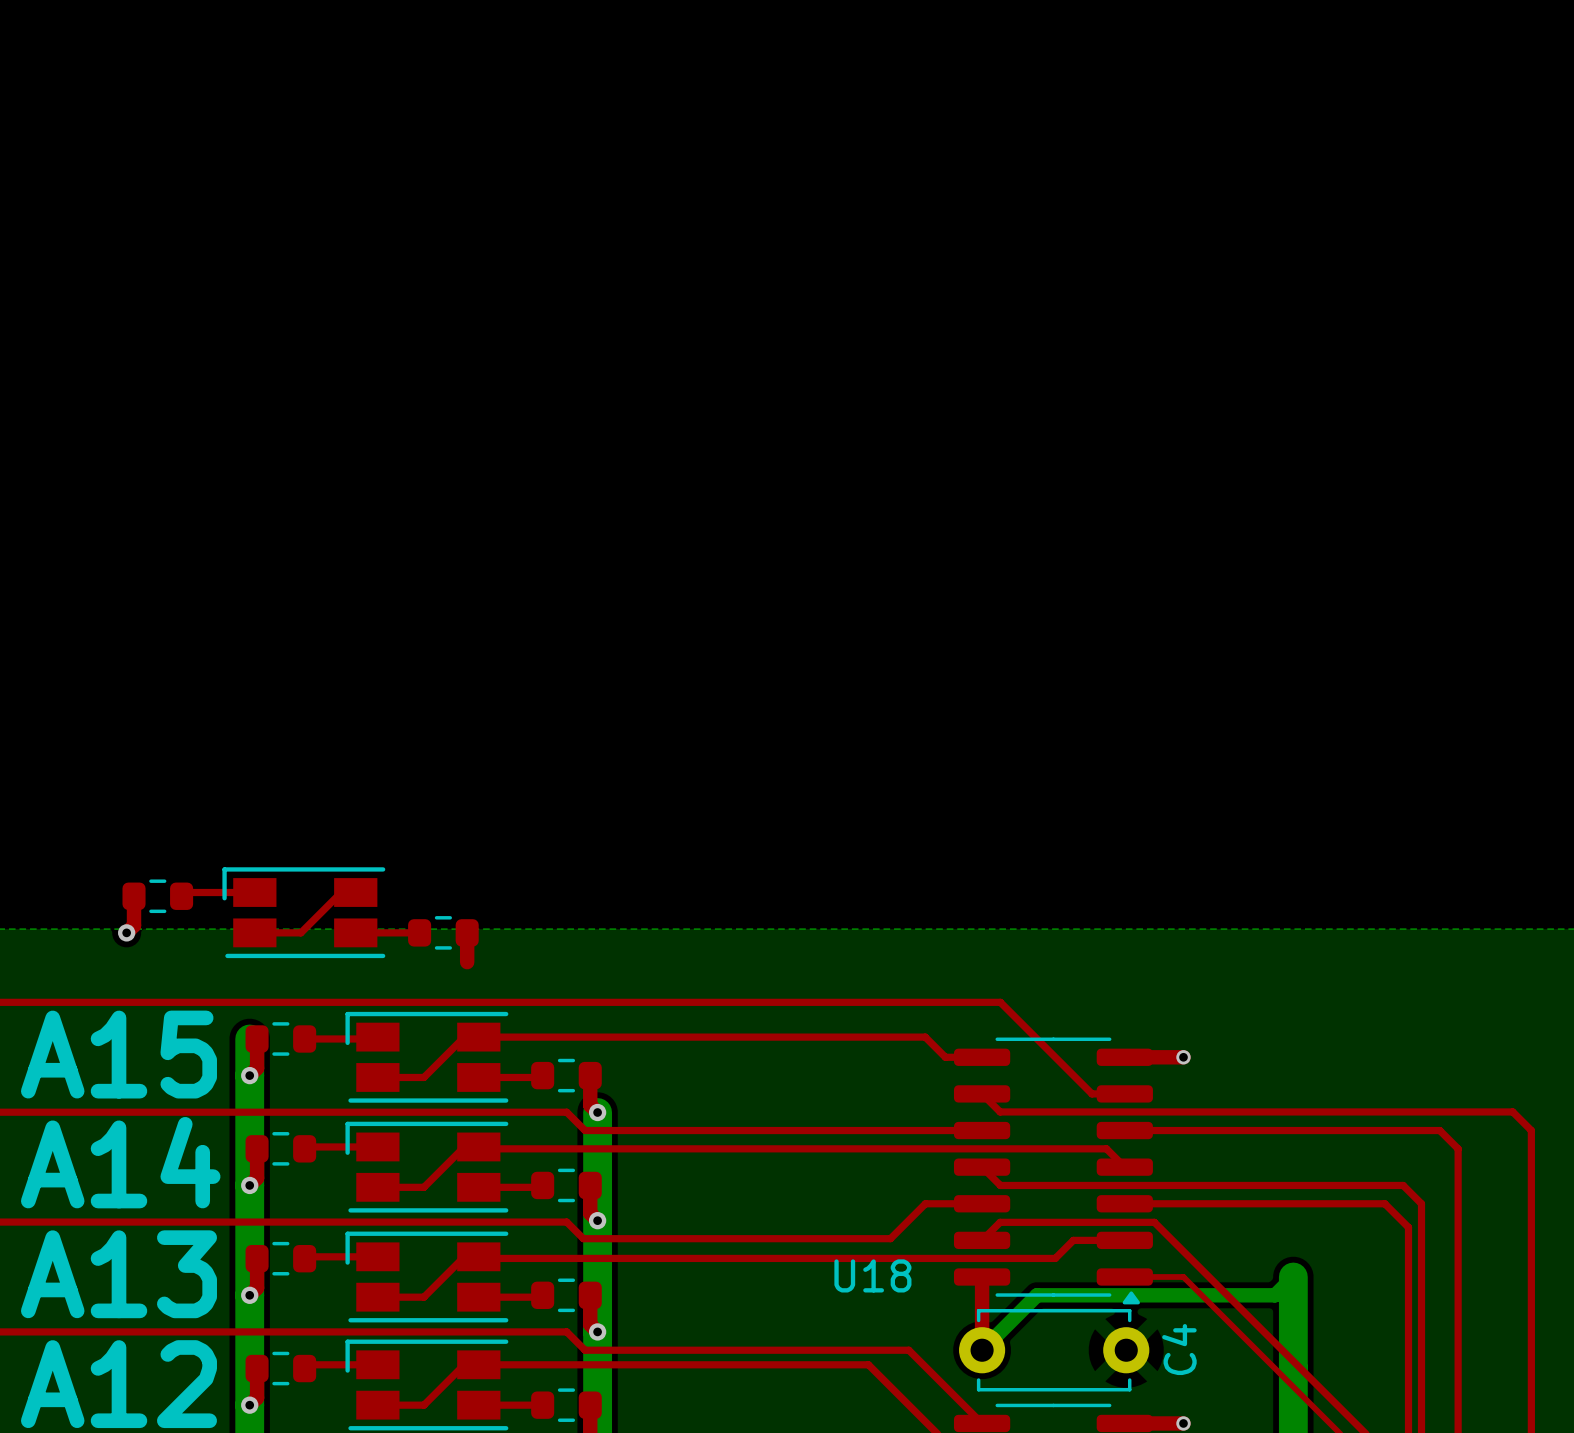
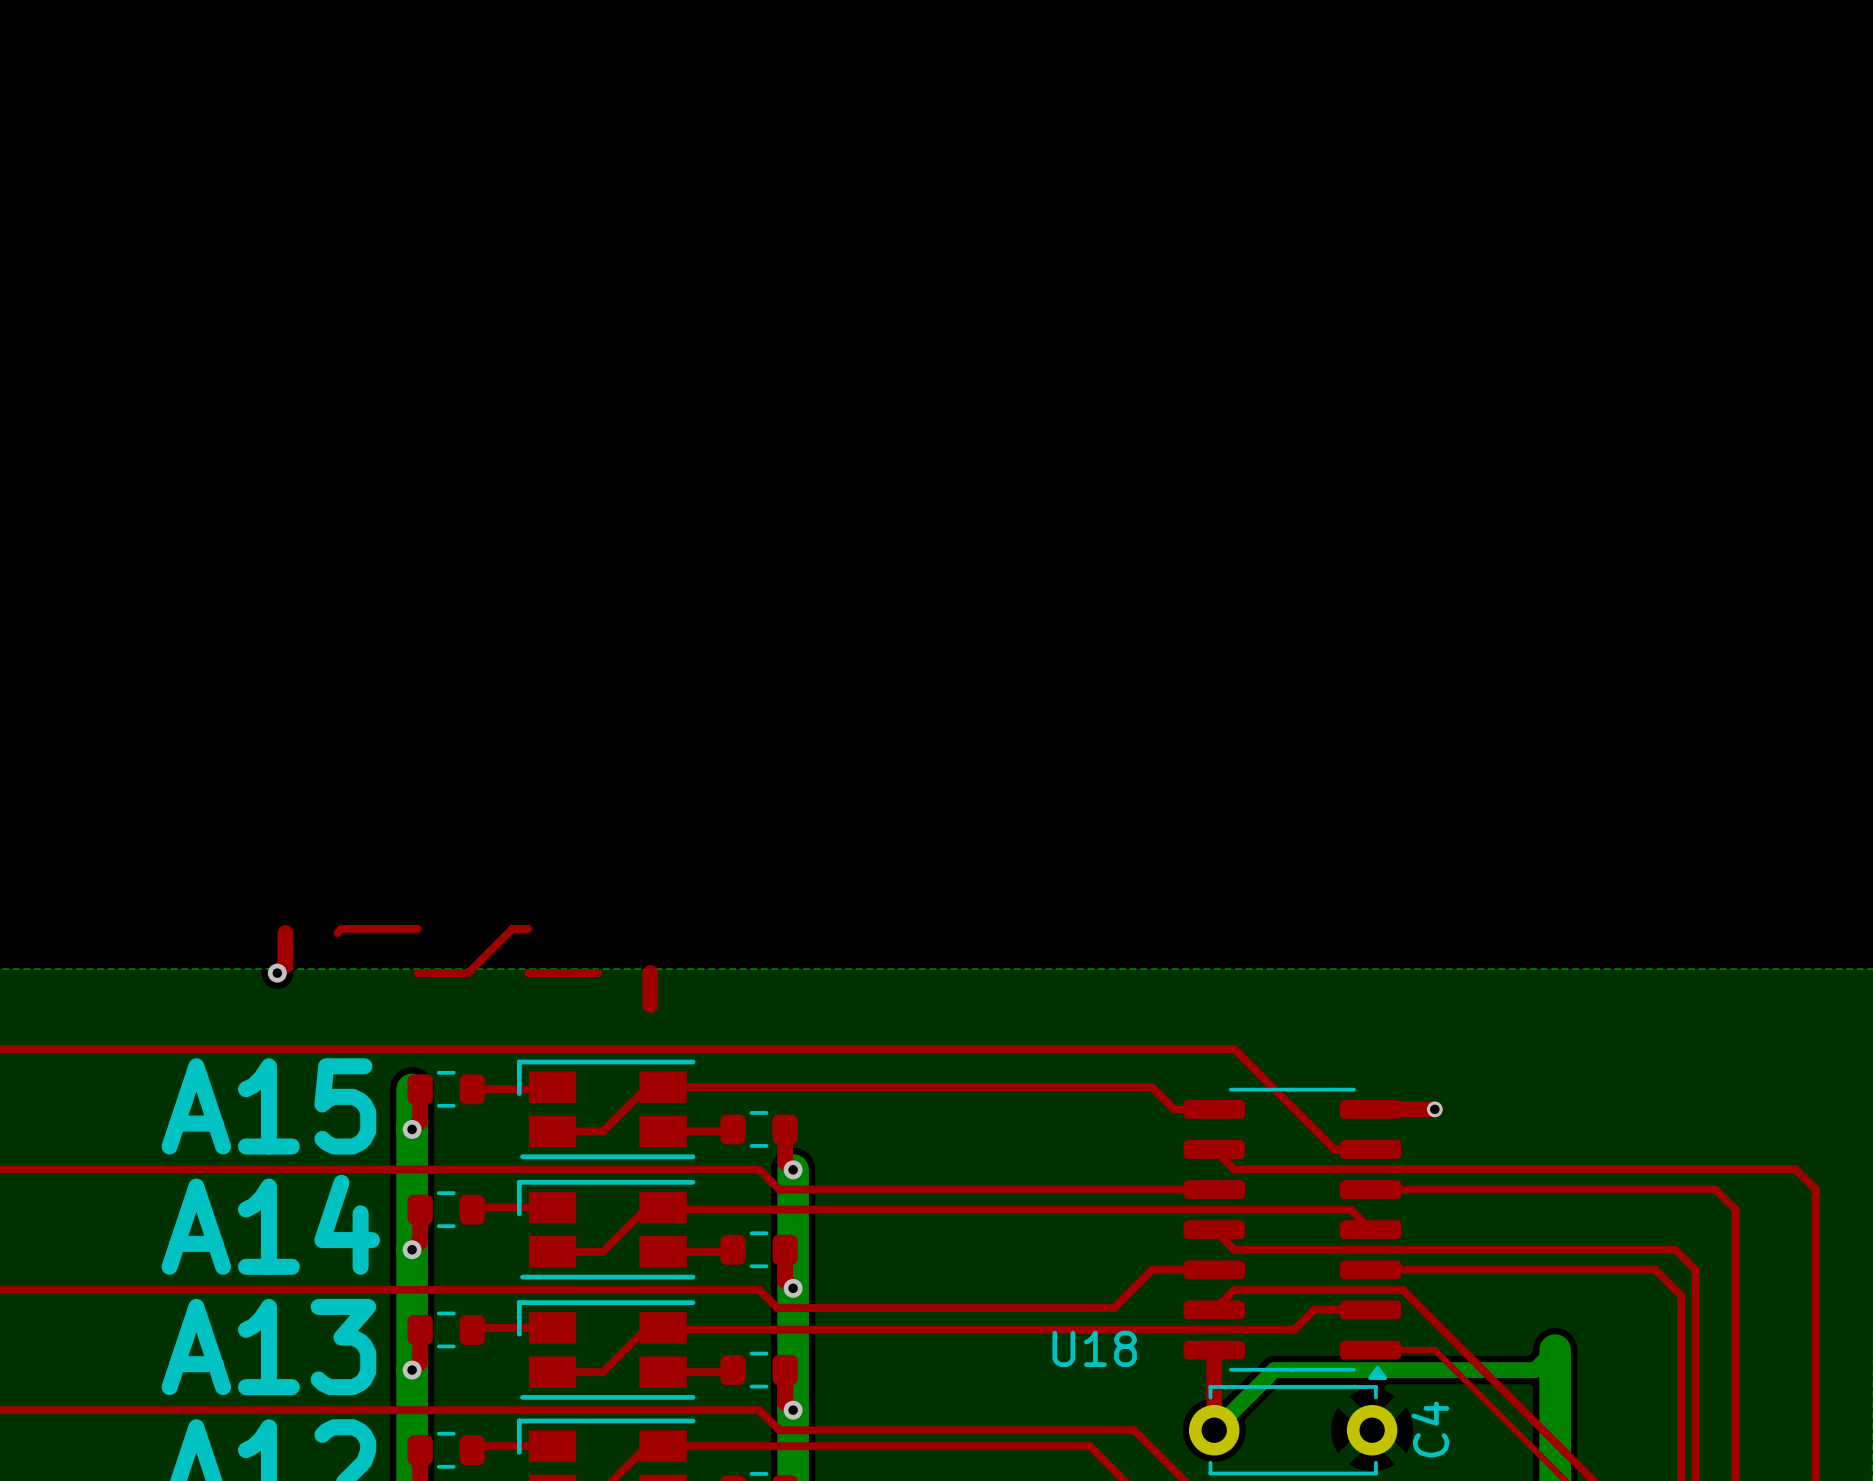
part: (157, 896) -> none
part: (303, 912) -> none
part: (443, 932) -> none

